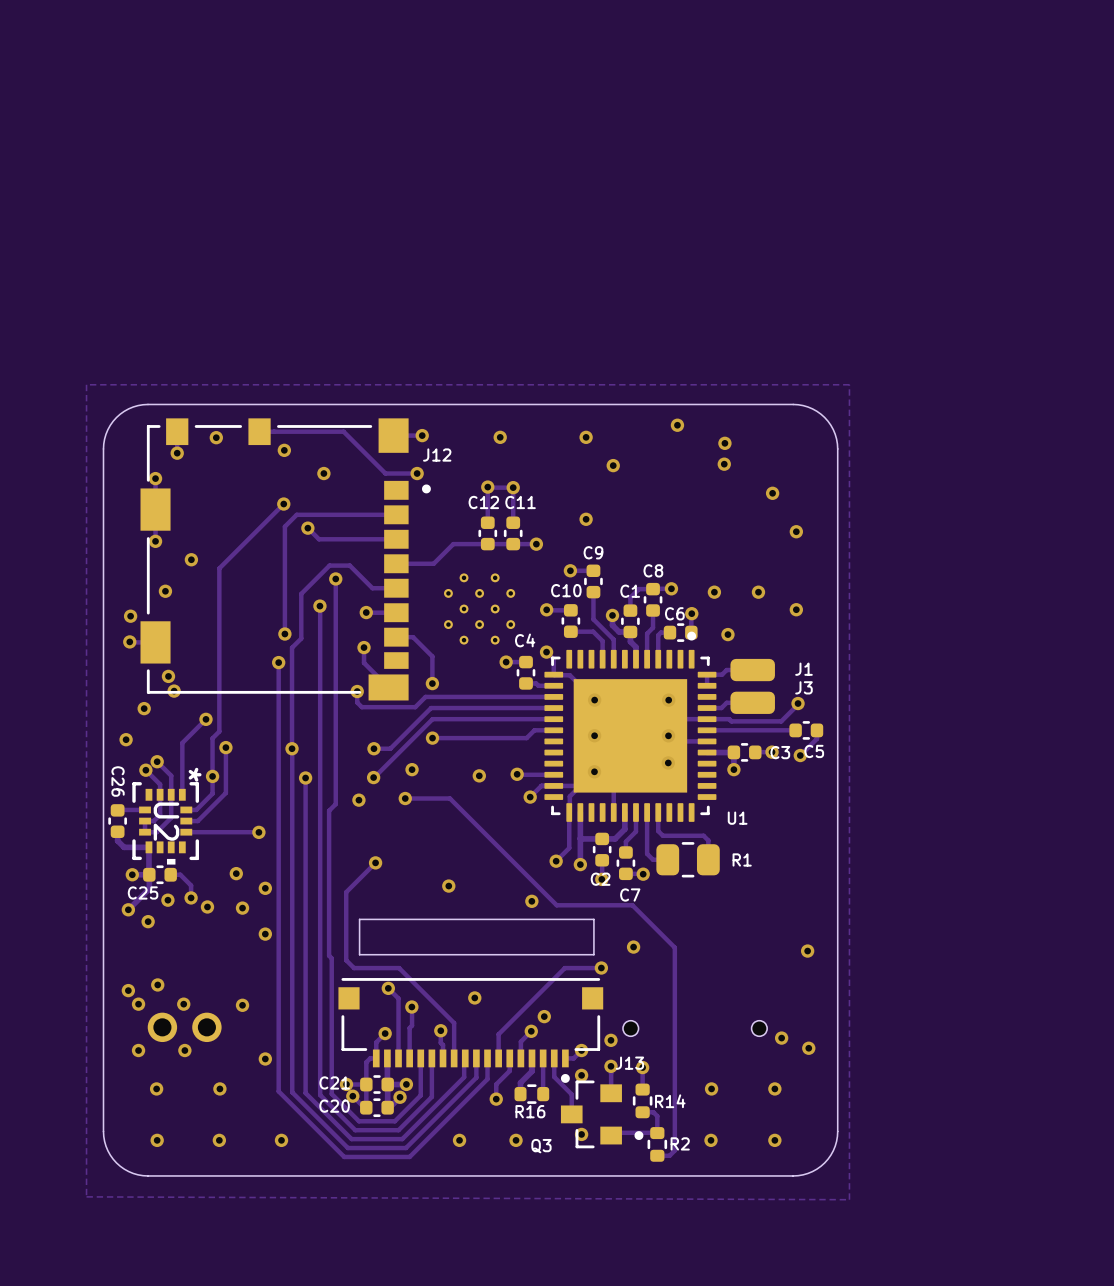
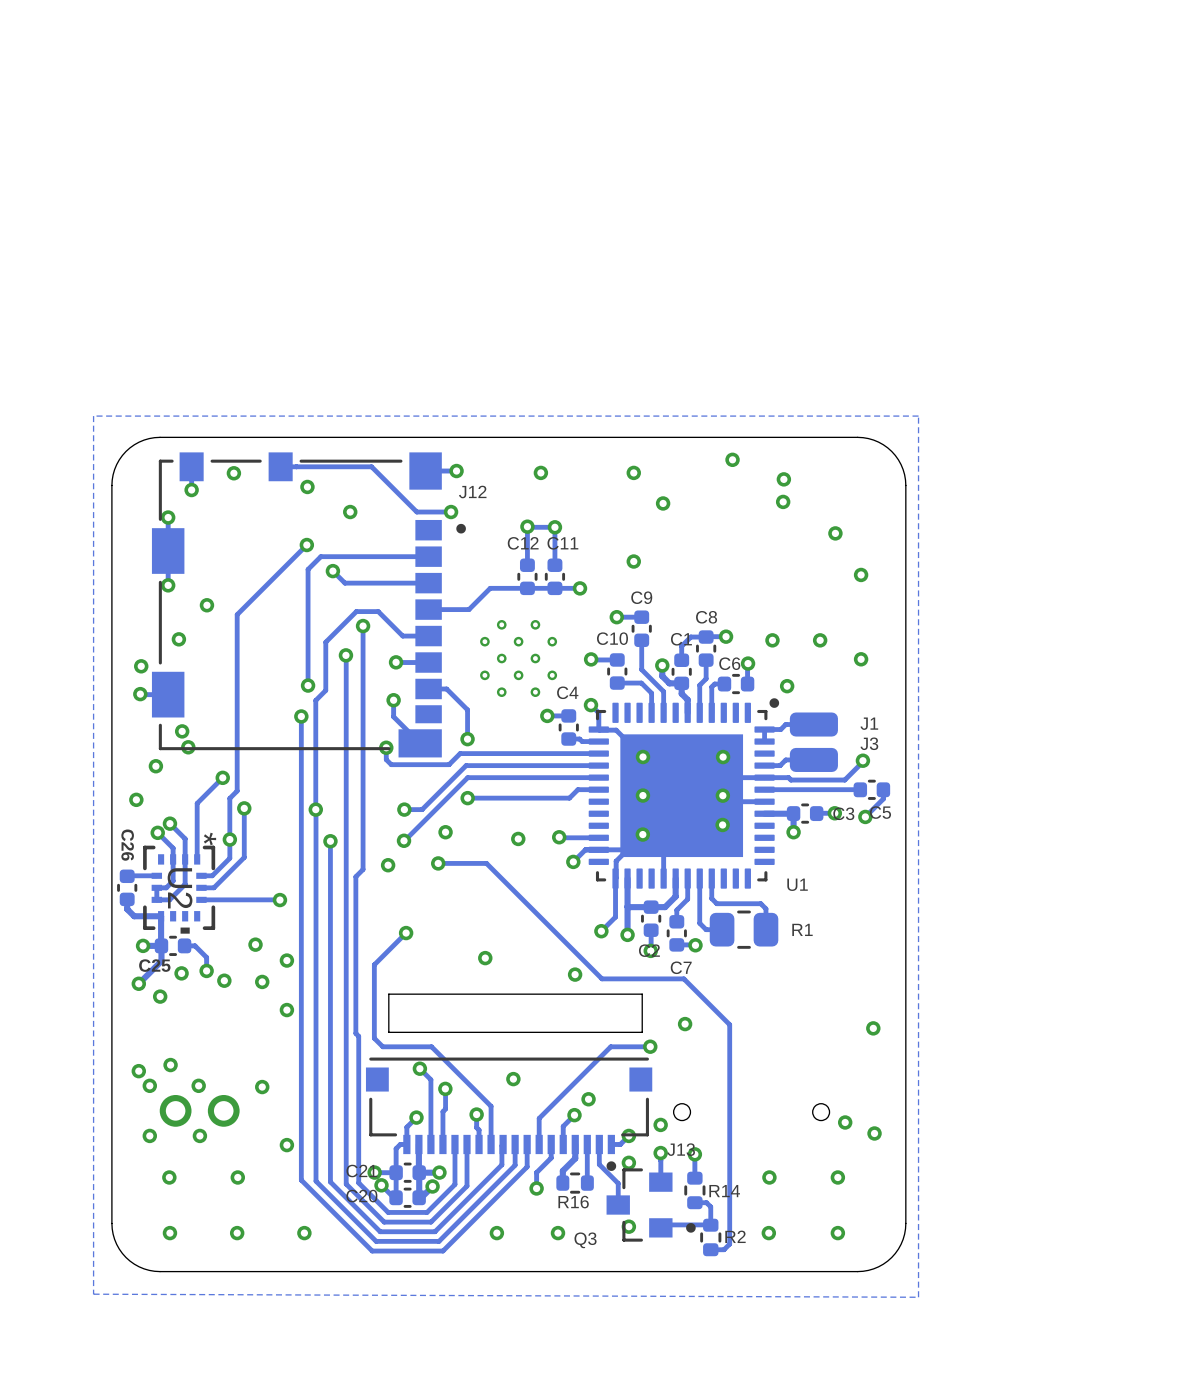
U1 footprint: [544, 631, 717, 822] -> [588, 698, 780, 889]
U2 footprint: [132, 782, 200, 865] -> [143, 845, 216, 934]

